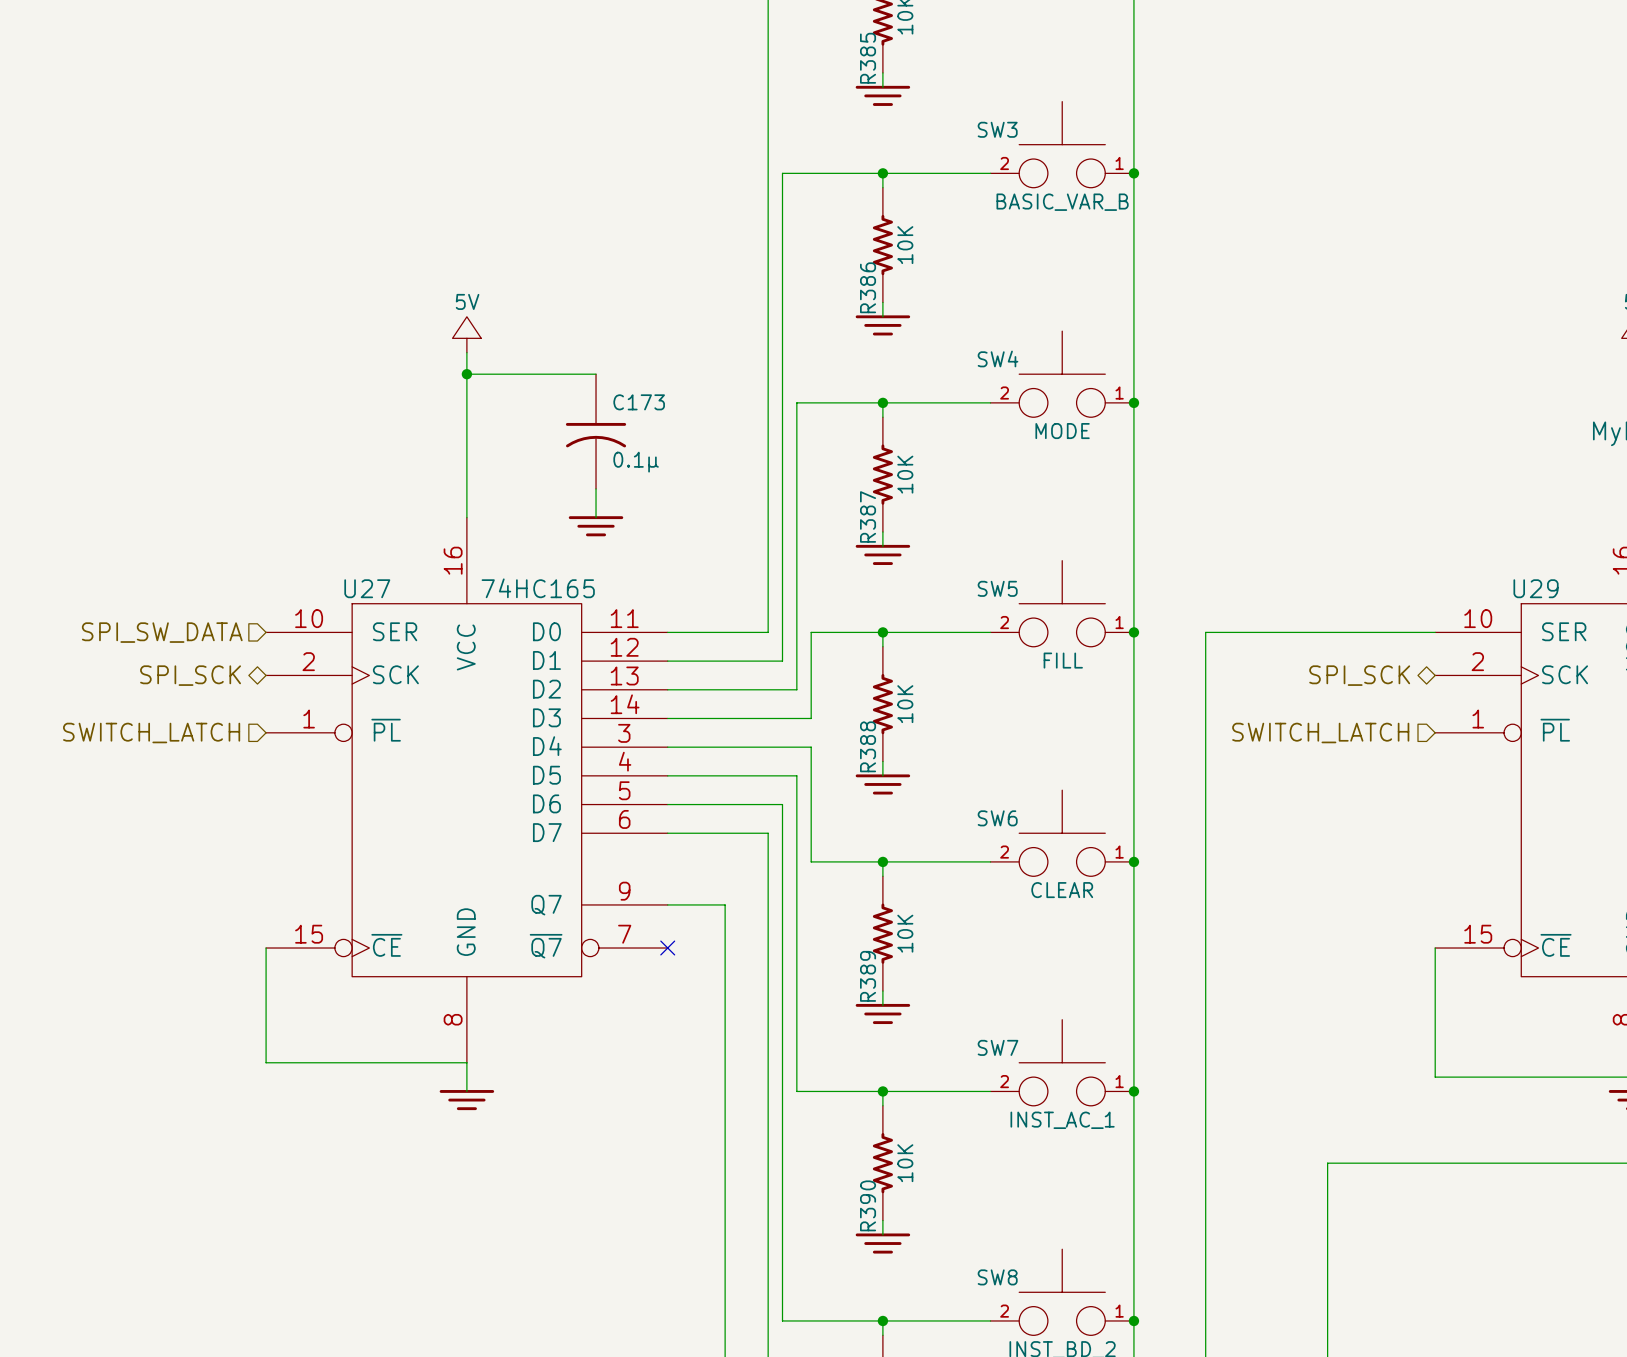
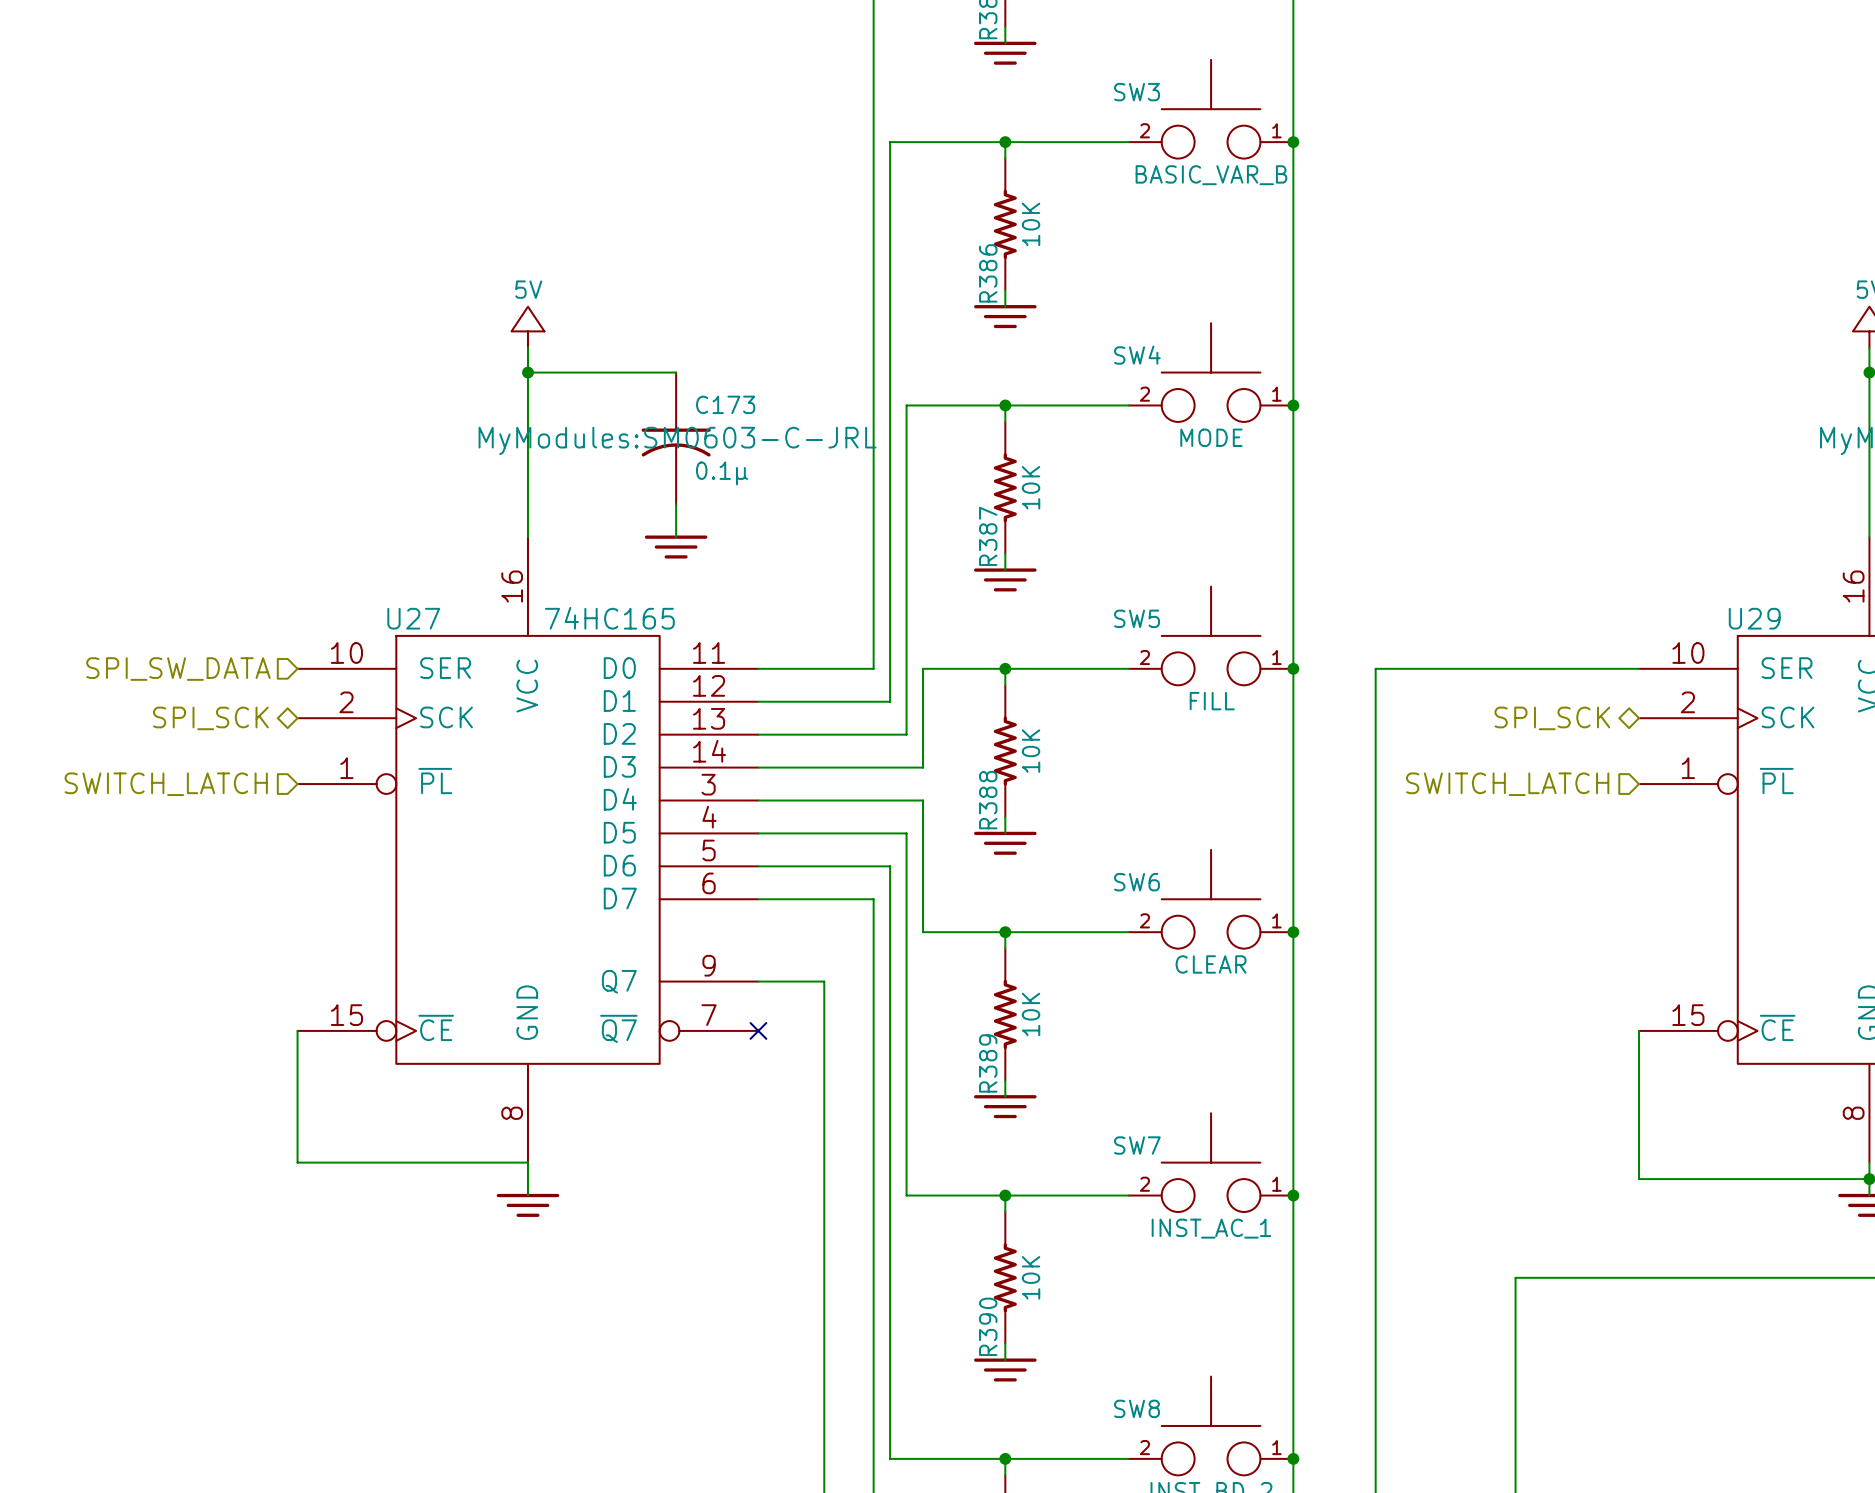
C173 text: none -> MyModules:SM0603-C-JRL (677, 440)

